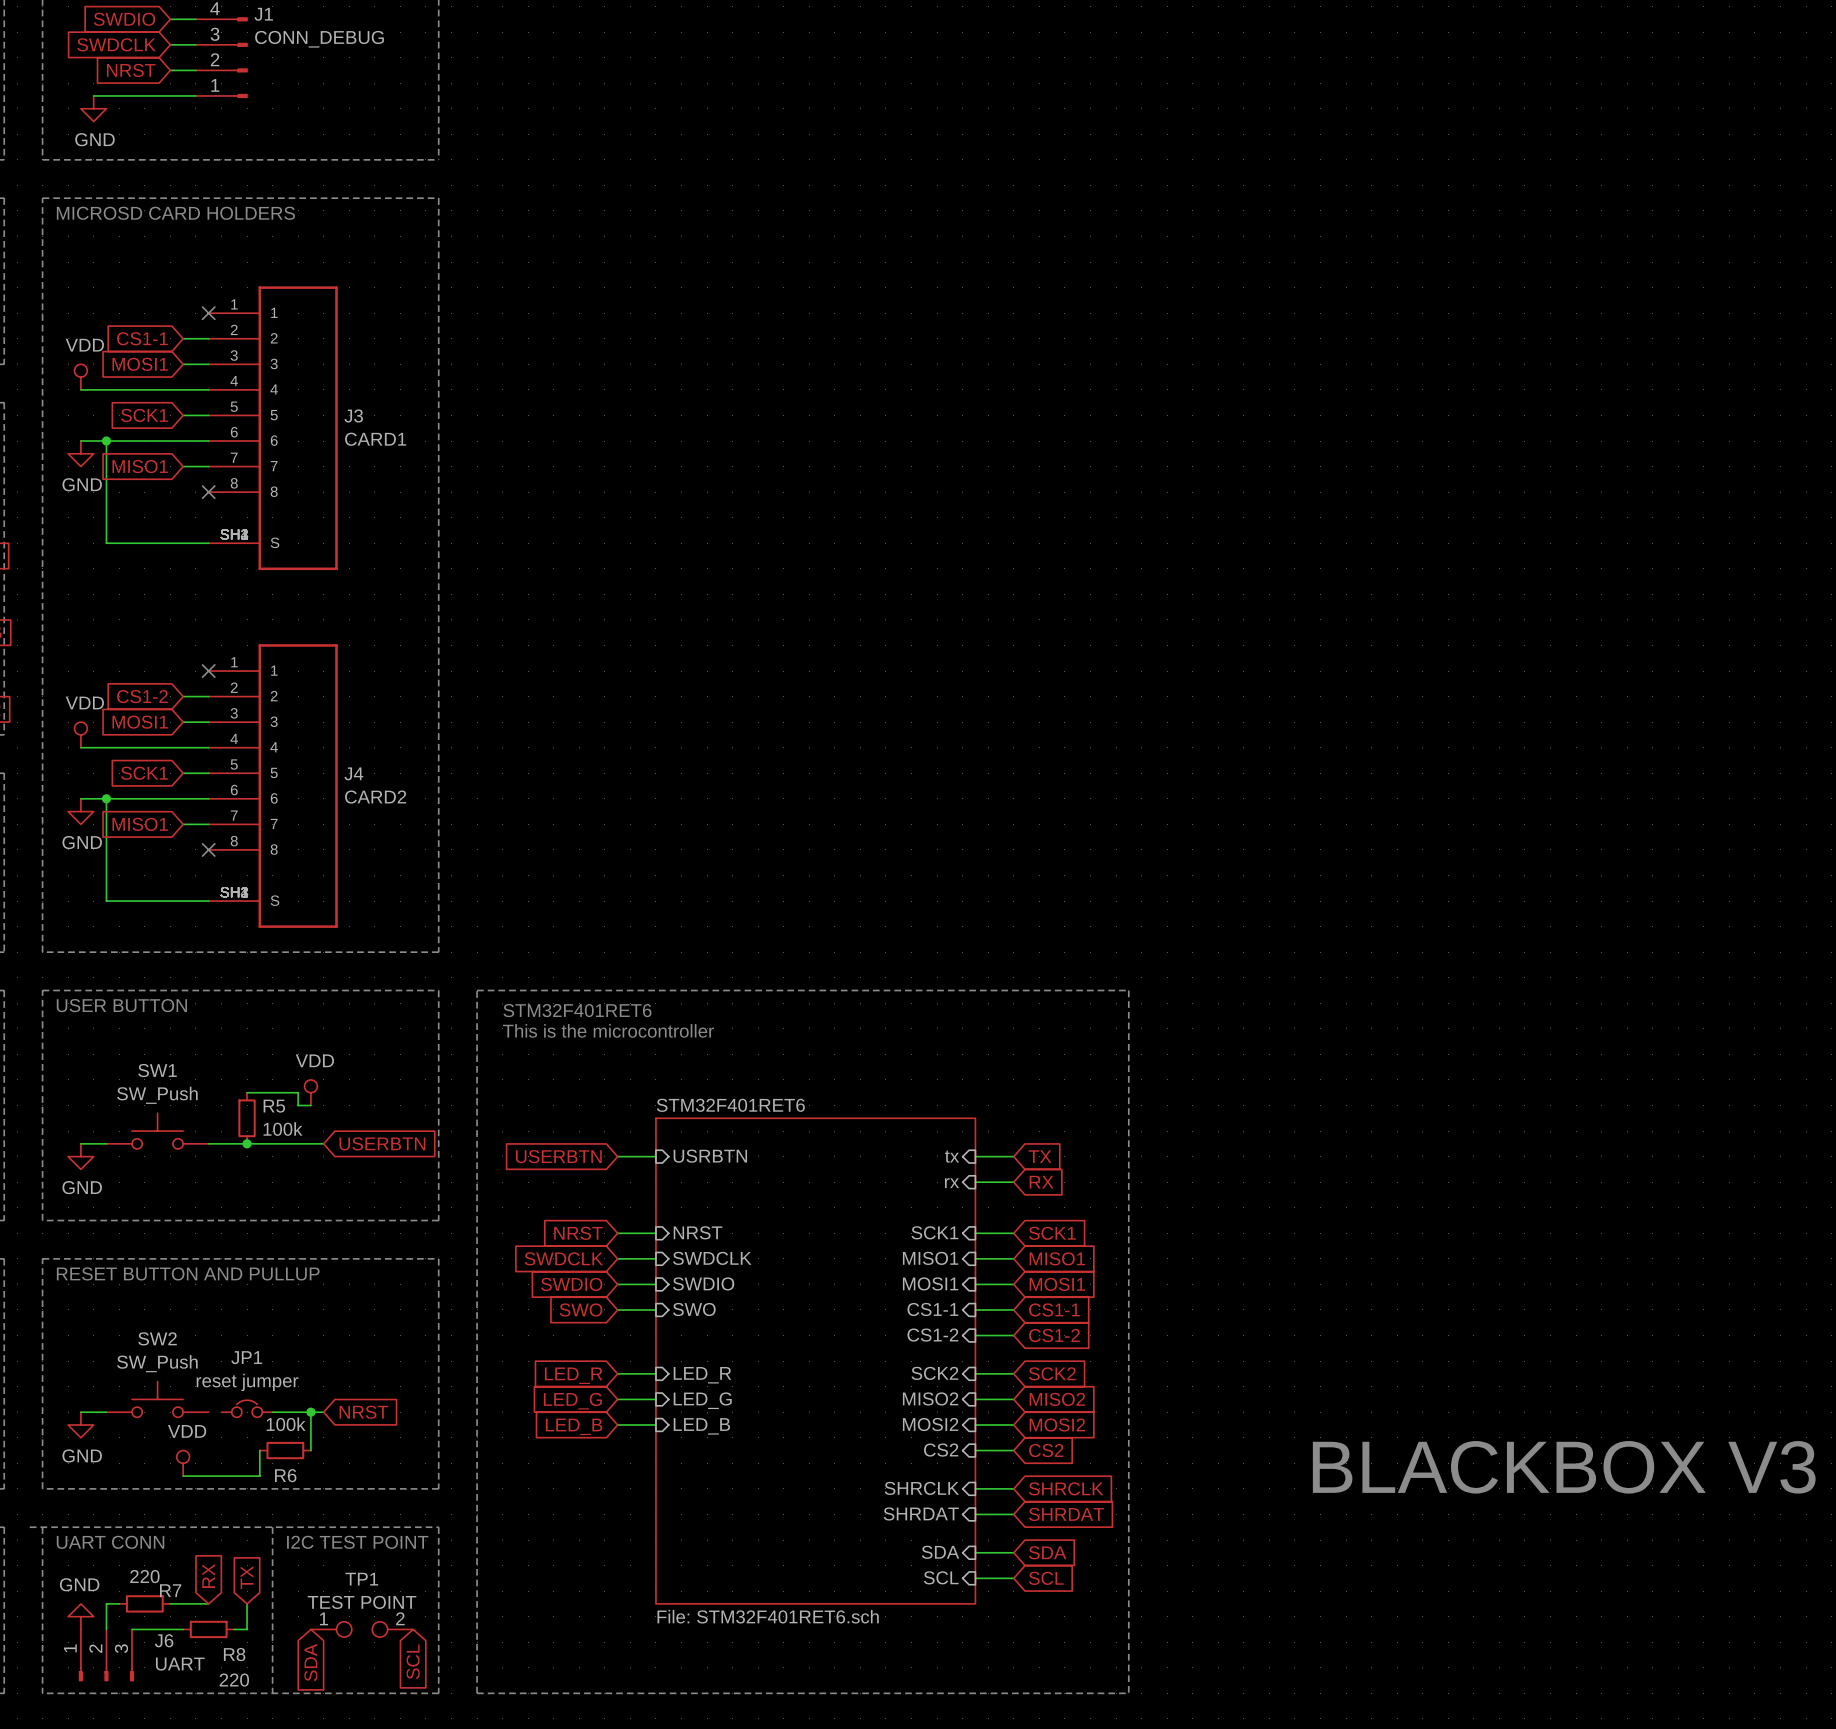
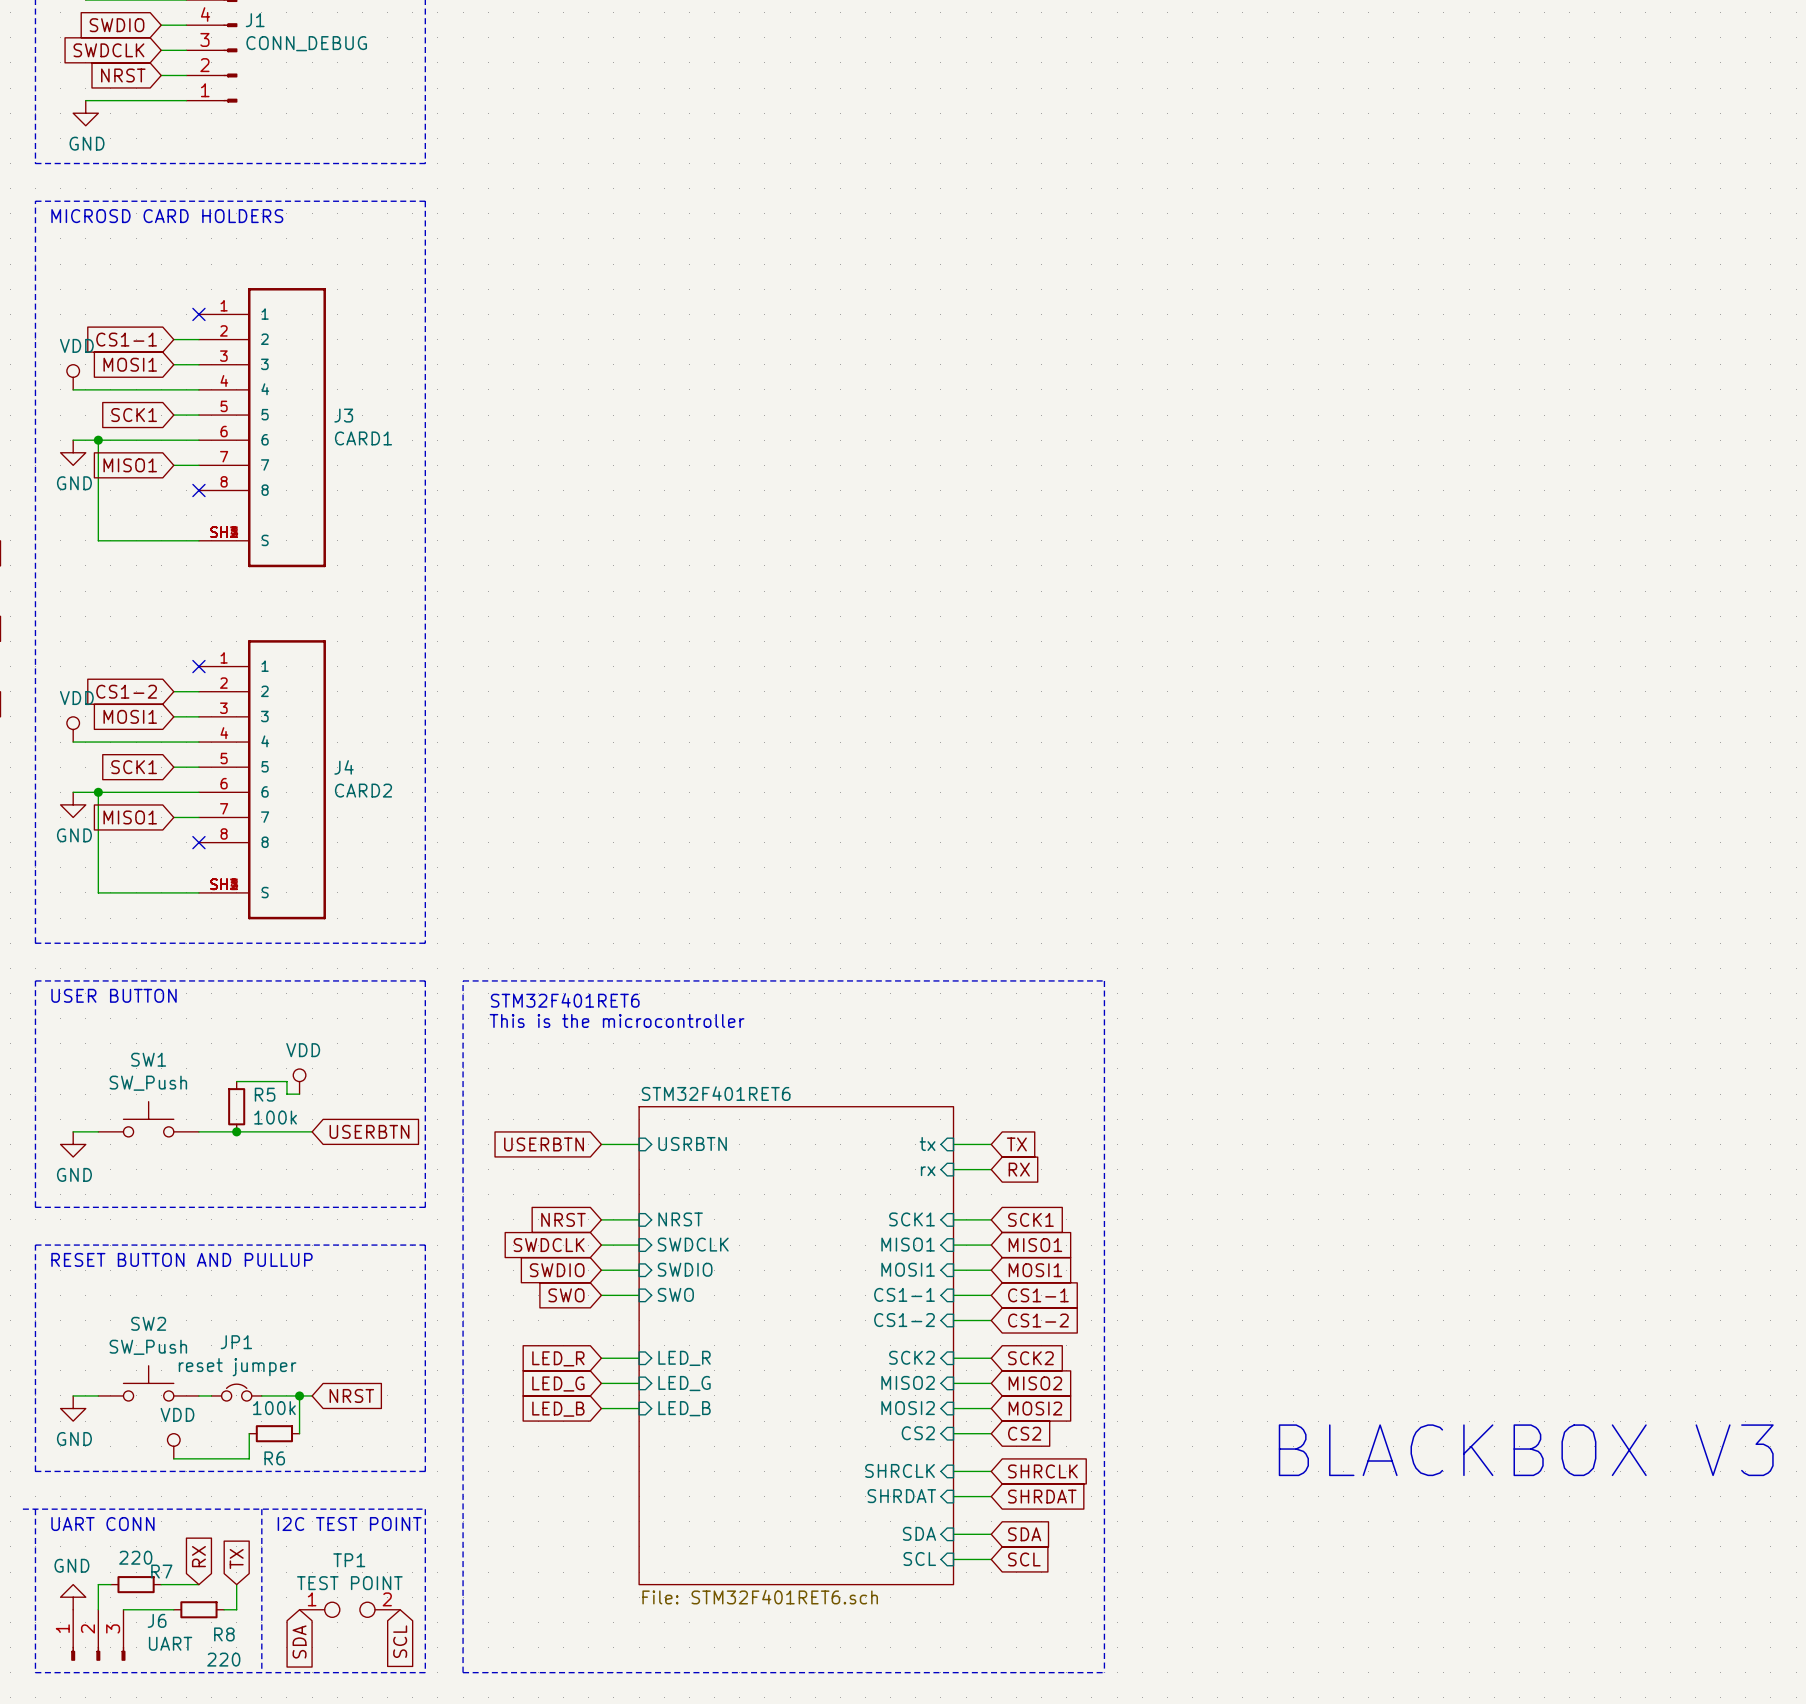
wire: none -> (198, 1395) (211, 1395)

